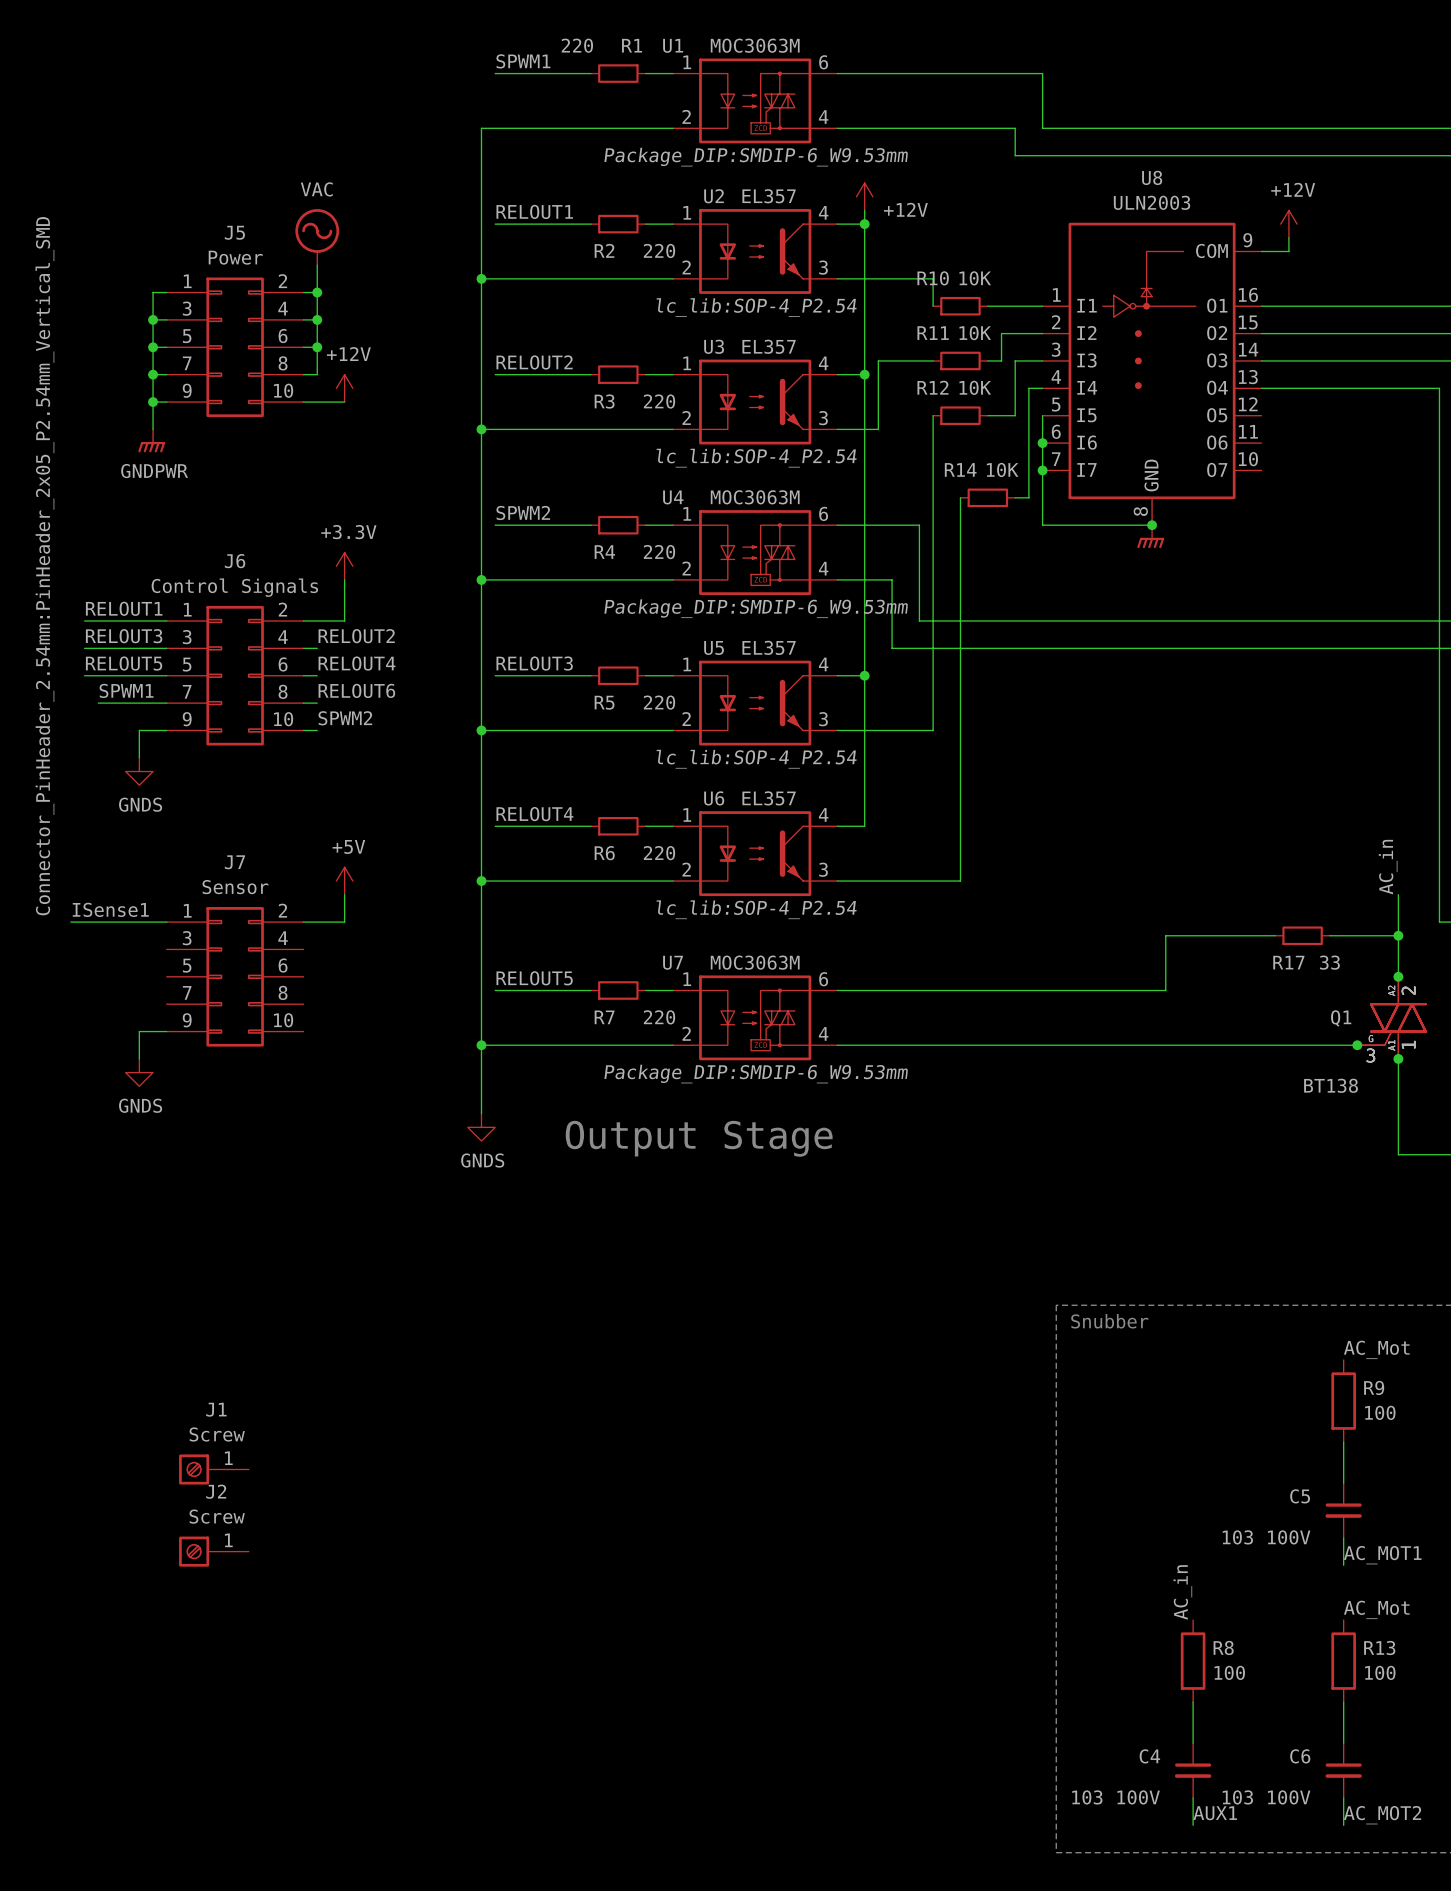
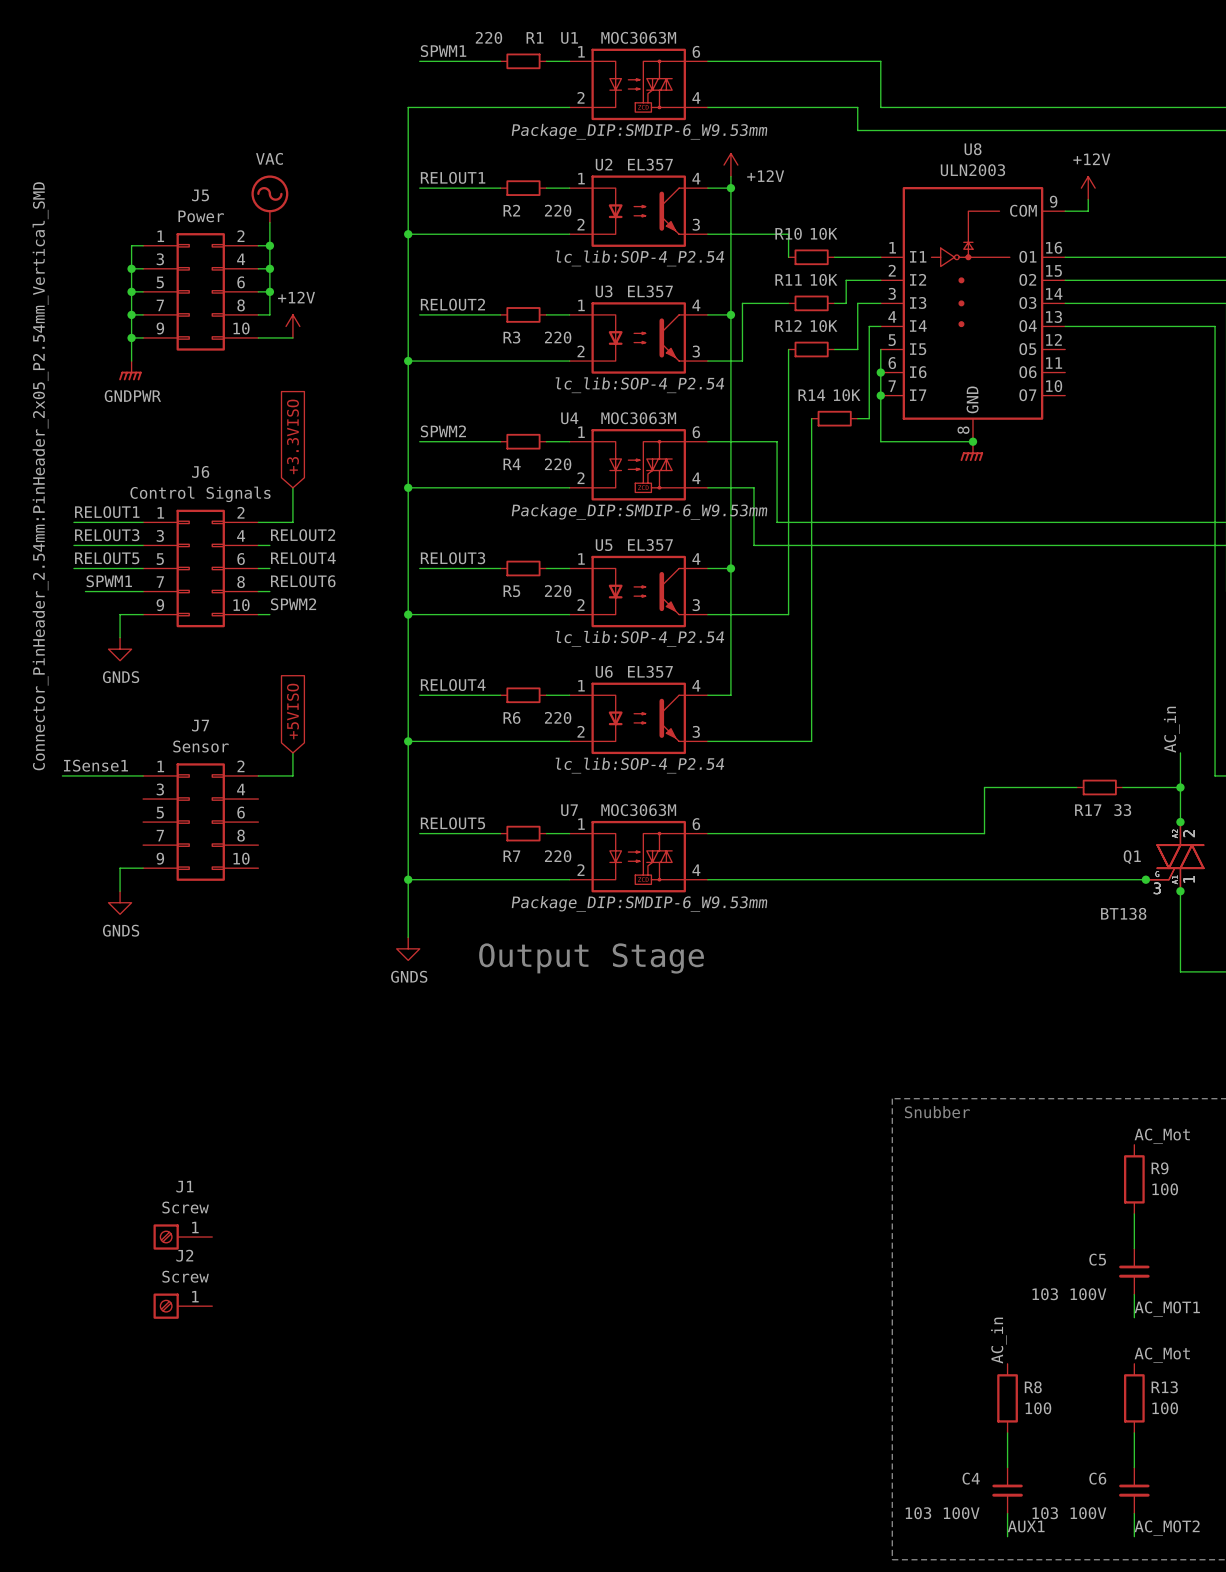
global label: none -> +3.3VISO (292, 436)
power symbol: +3.3V (344, 566) -> none
global label: none -> +5VISO (292, 711)
power symbol: +5V (344, 881) -> none

